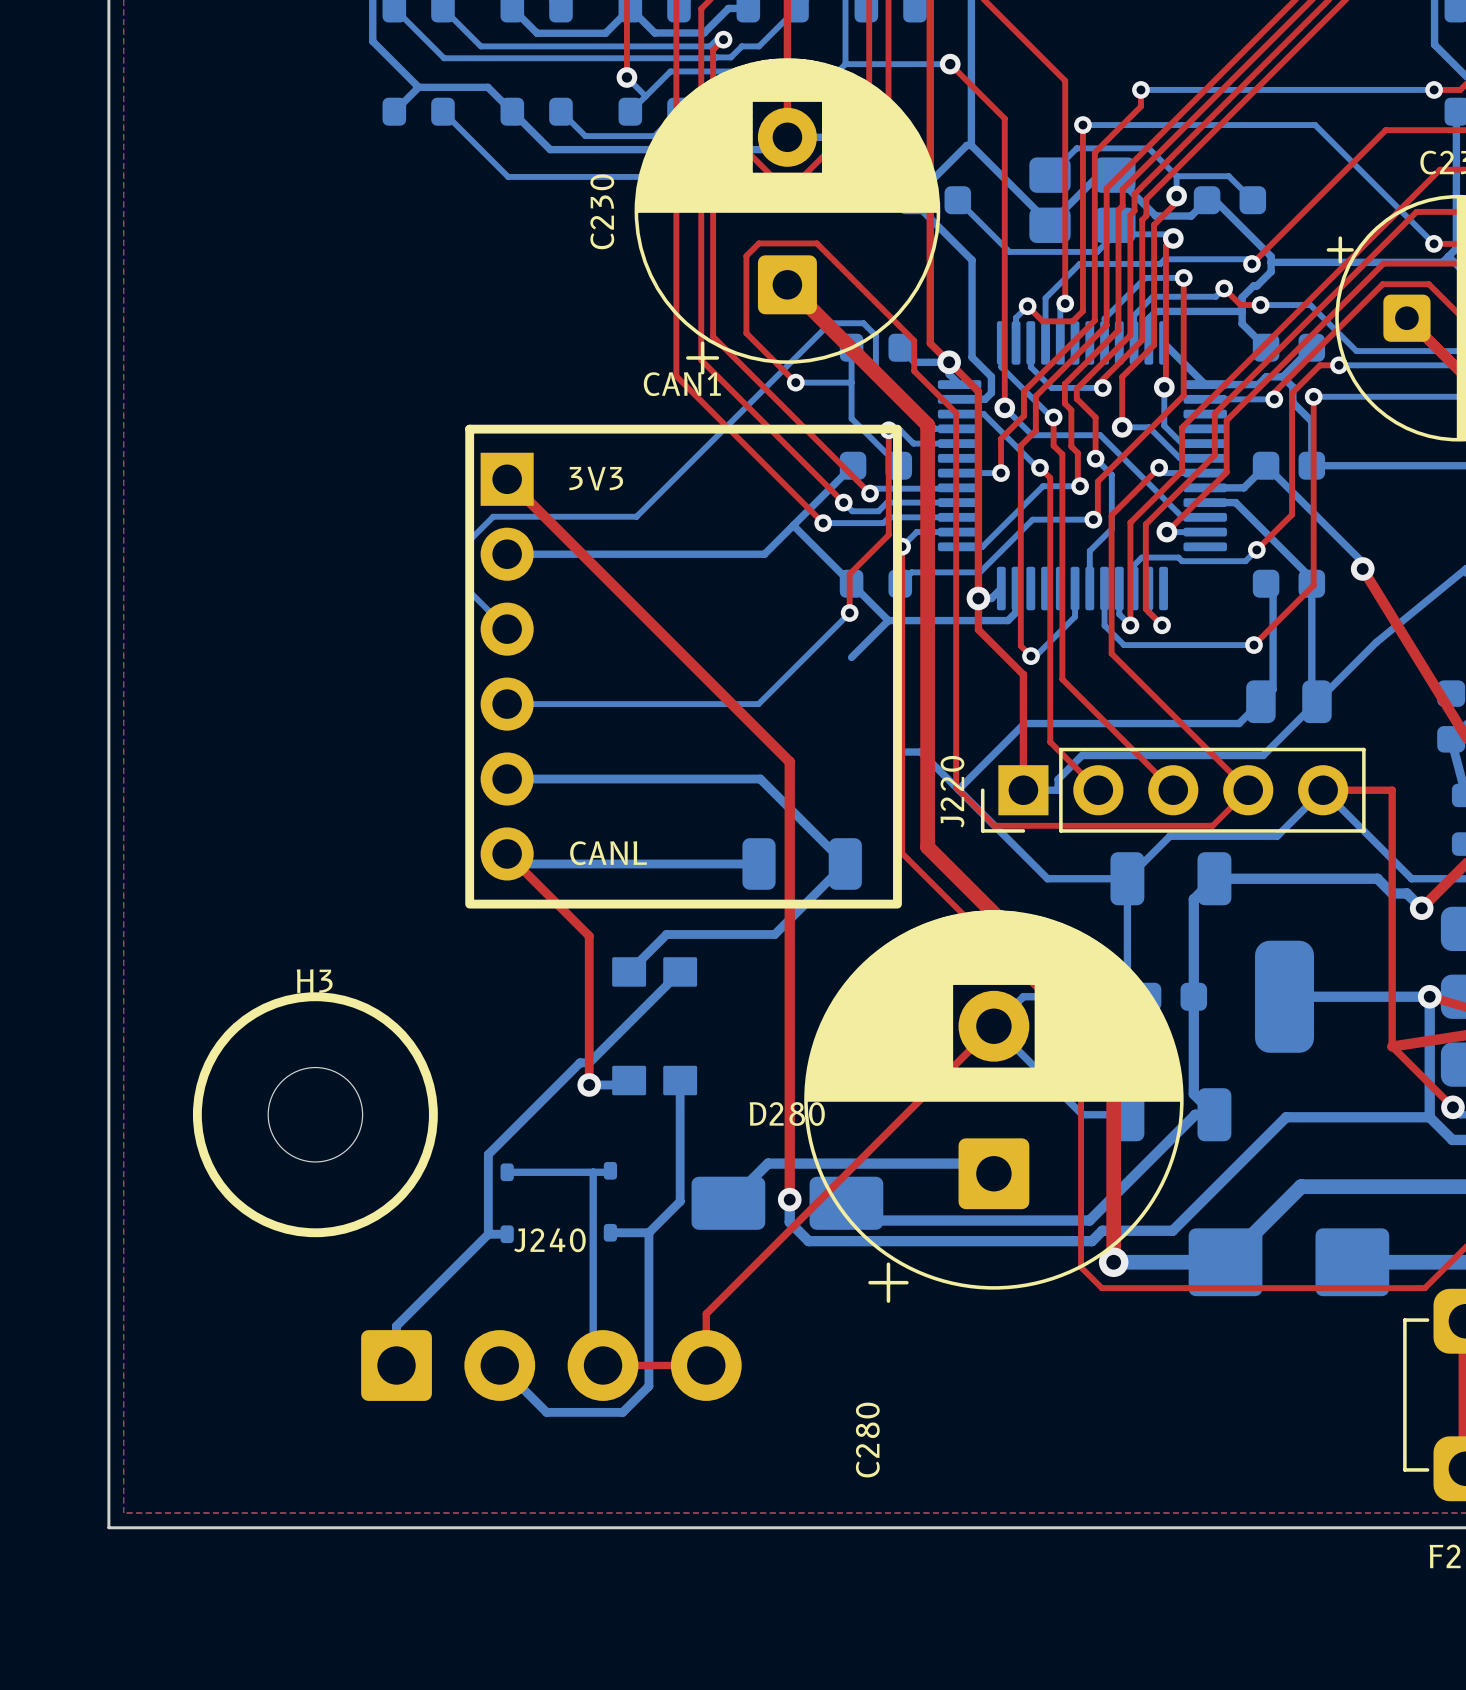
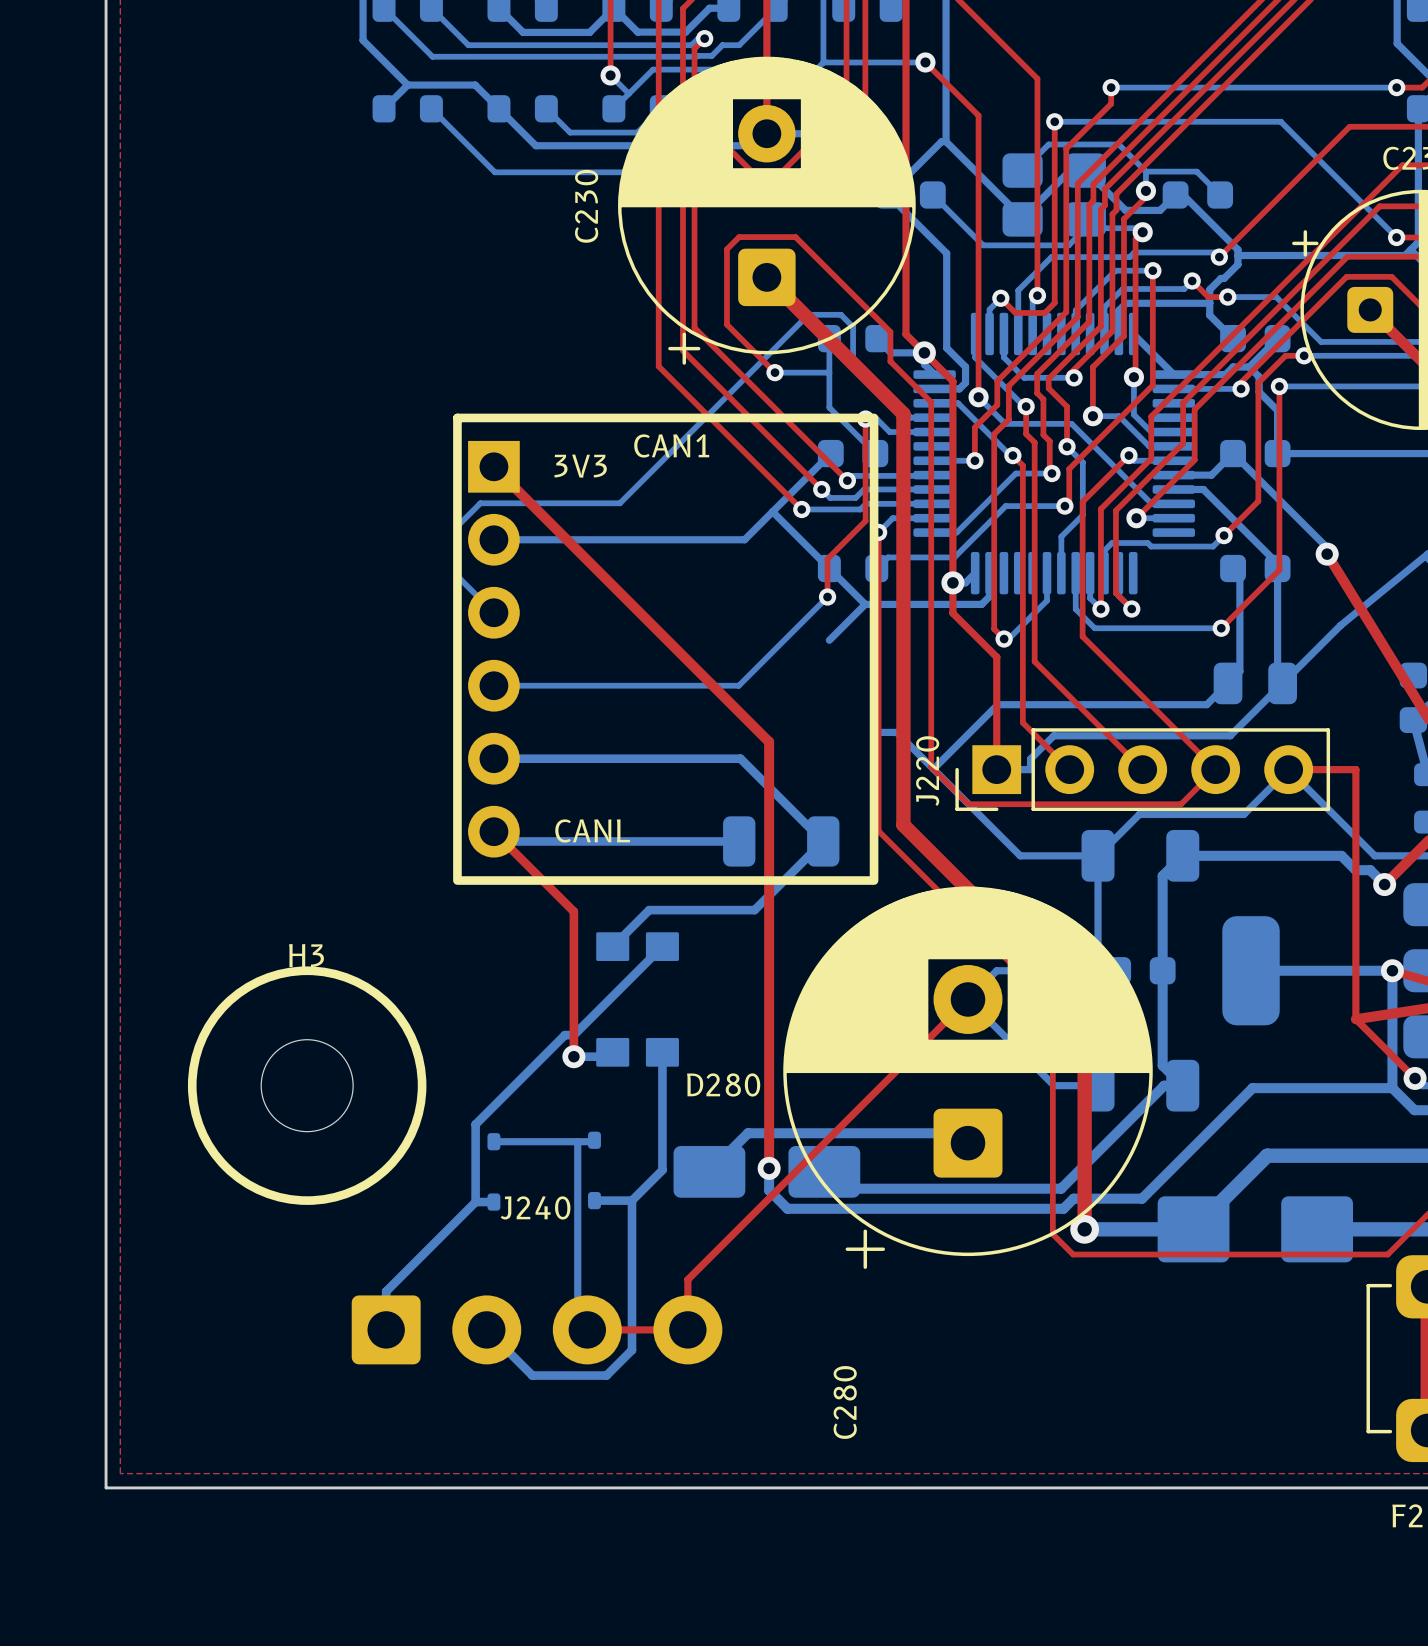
CAN1 name position: CAN1 (682, 384) -> CAN1 (671, 445)
D280 name position: D280 (787, 1114) -> D280 (723, 1084)

